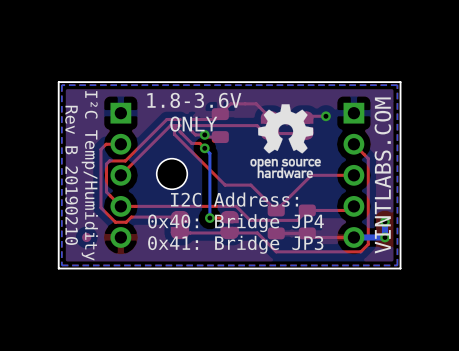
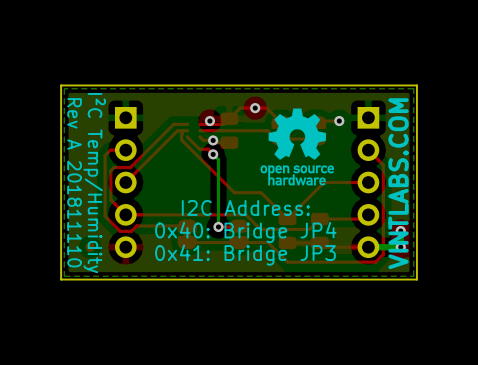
text: 1.8-3.6V (194, 100) -> none
via: none -> (255, 108)
via: none -> (209, 121)
text: ONLY (193, 124) -> none
part: (172, 173) -> none
text: Rev B 20190210 (71, 175) -> Rev A 201811110 (74, 182)

